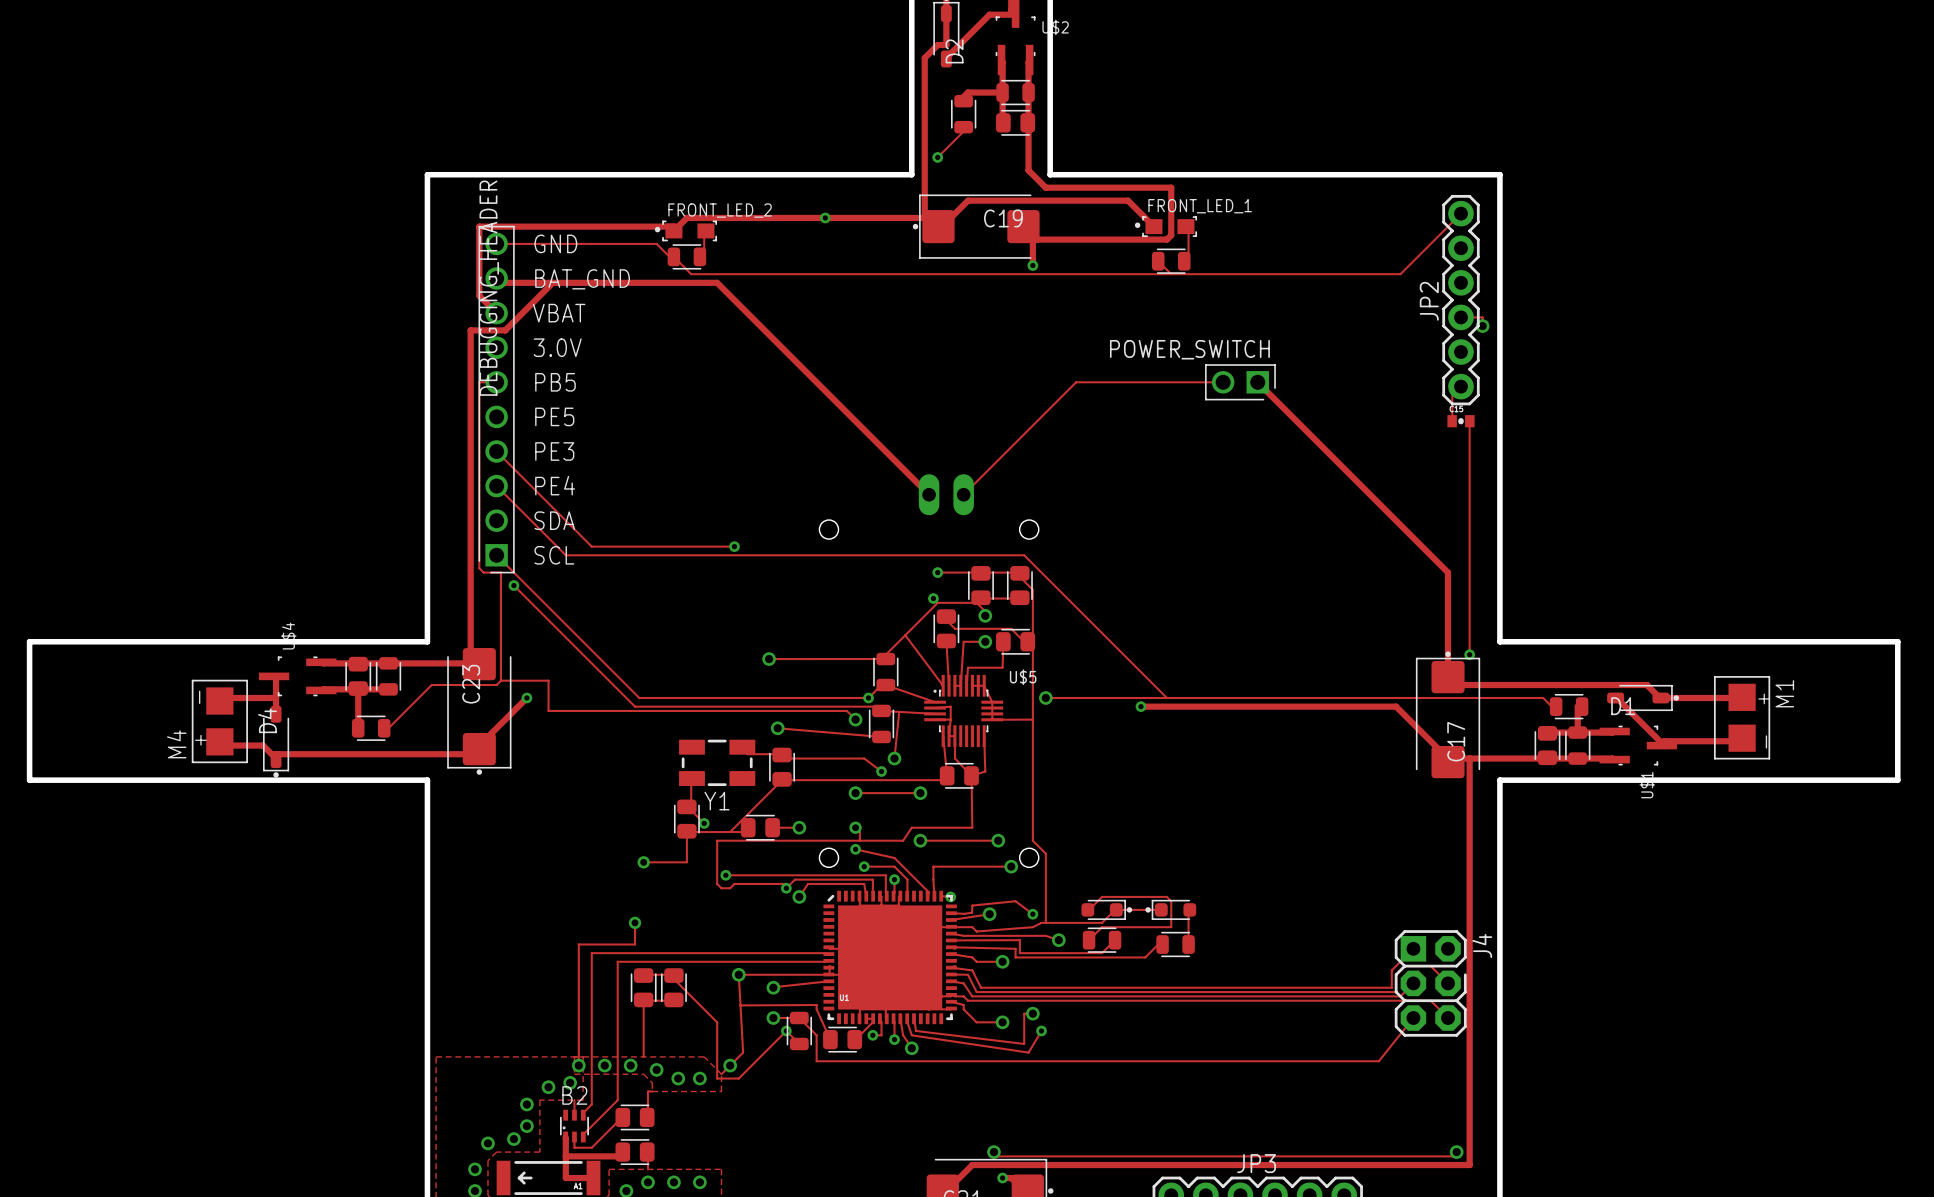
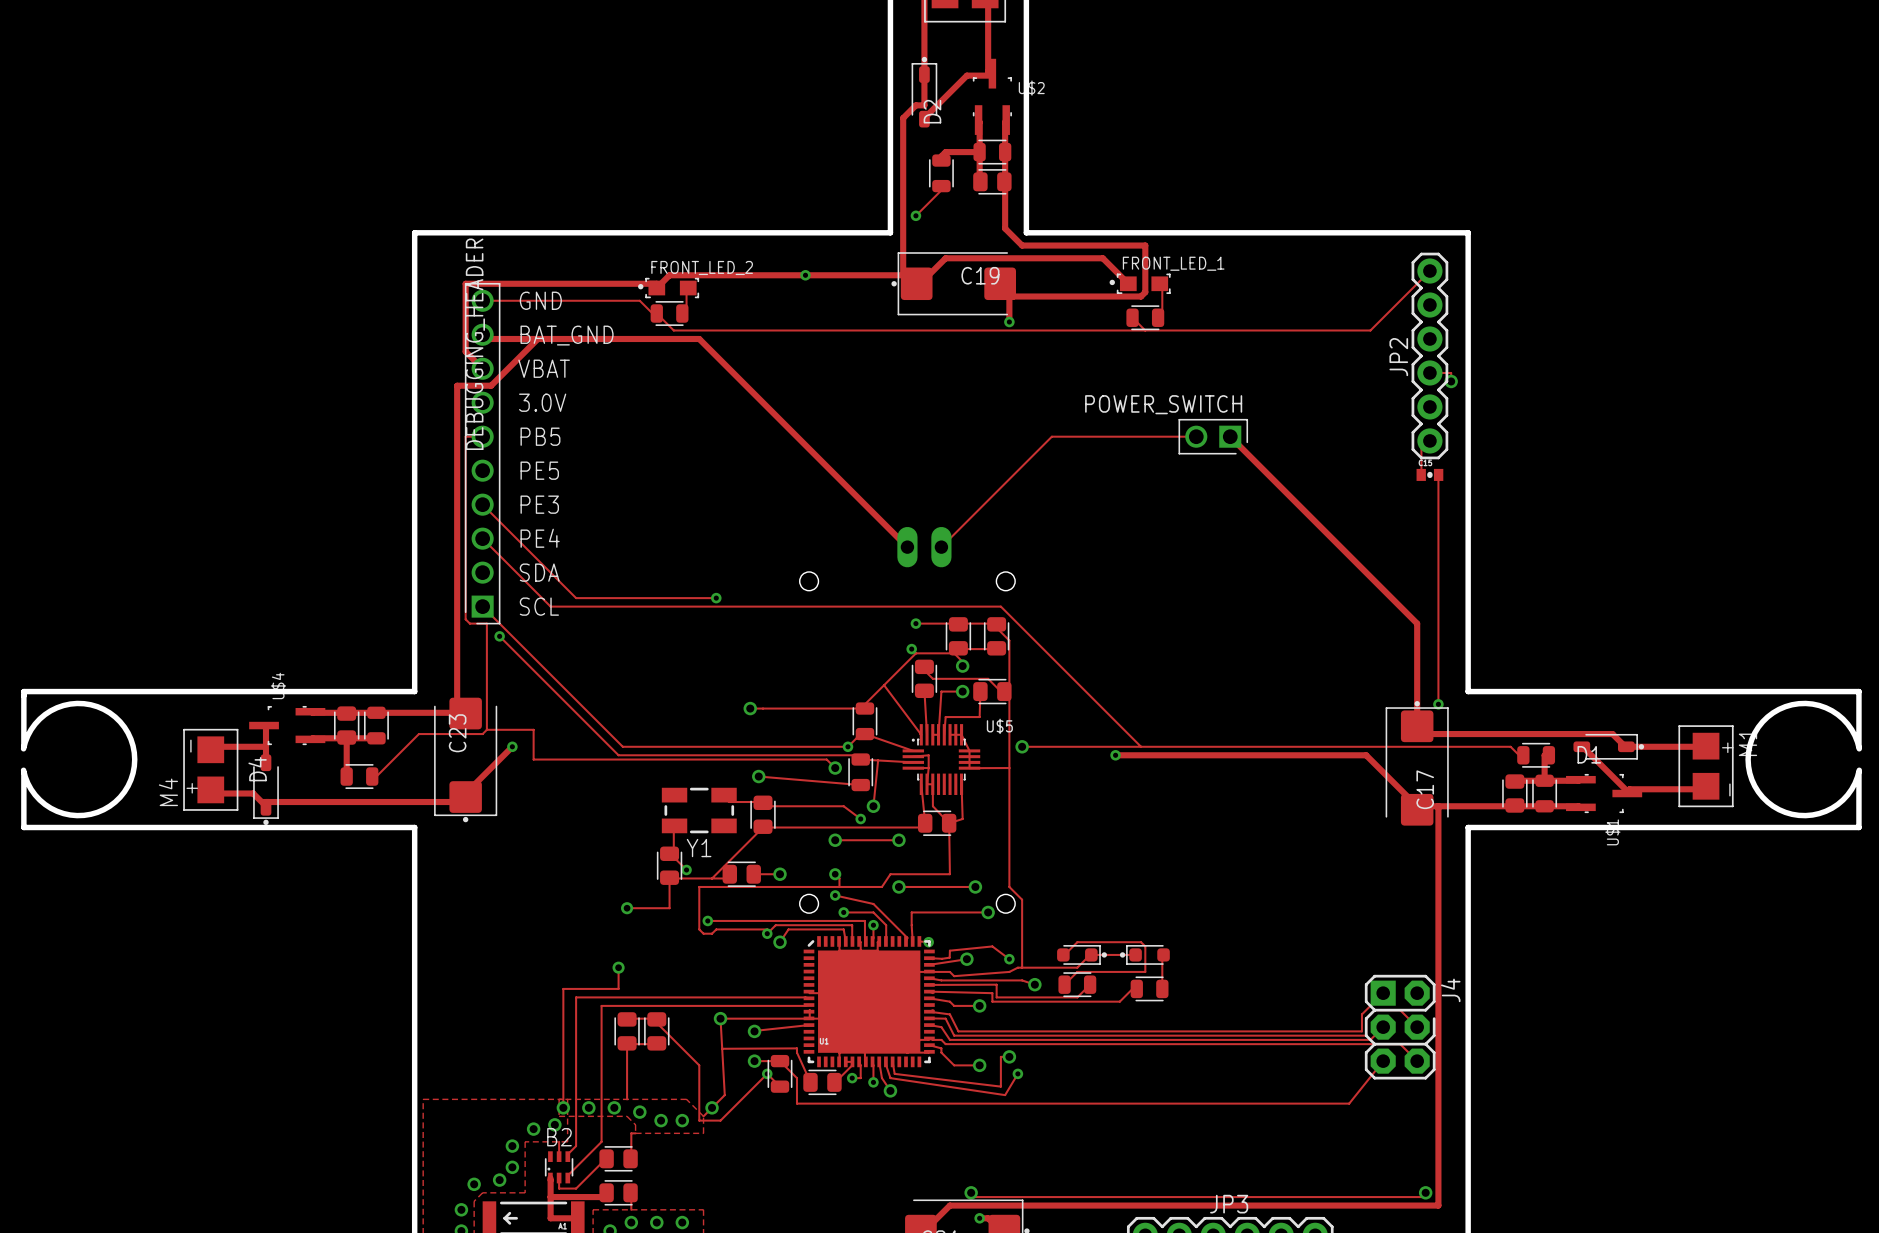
board edge: (29, 697) (29, 723) -> none
board edge: (1897, 697) (1897, 723) -> none
board edge: none -> (23, 748) (31, 729) (45, 714) (63, 705) (84, 703) (103, 709) (120, 721) (130, 739) (134, 759) (130, 779) (120, 797) (103, 809) (84, 815) (63, 813) (45, 804) (31, 789) (23, 770)
board edge: none -> (1859, 748) (1851, 729) (1837, 714) (1819, 705) (1798, 703) (1779, 709) (1762, 721) (1751, 739) (1748, 759) (1751, 779) (1762, 797) (1779, 809) (1798, 815) (1819, 813) (1837, 804) (1851, 789) (1859, 770)

